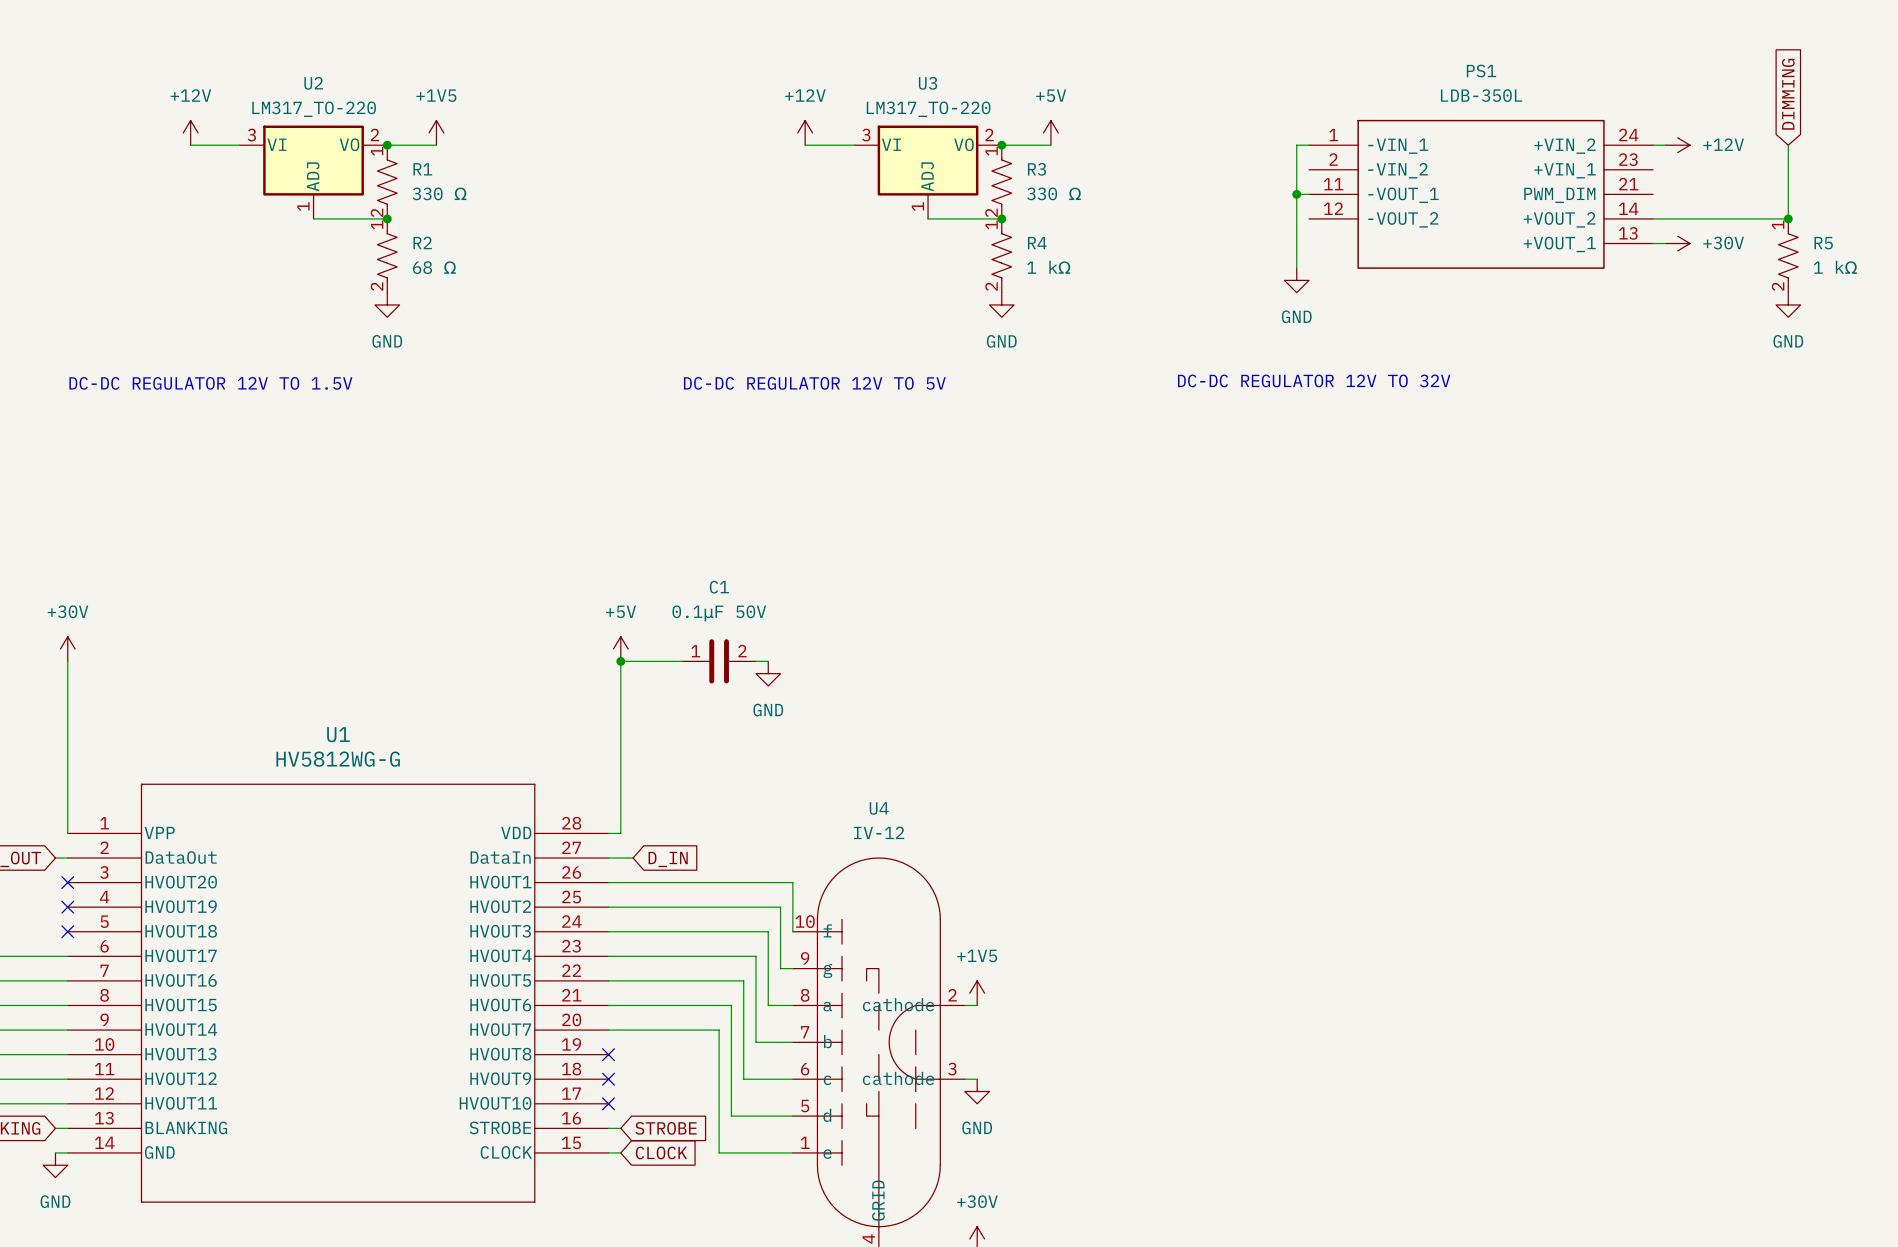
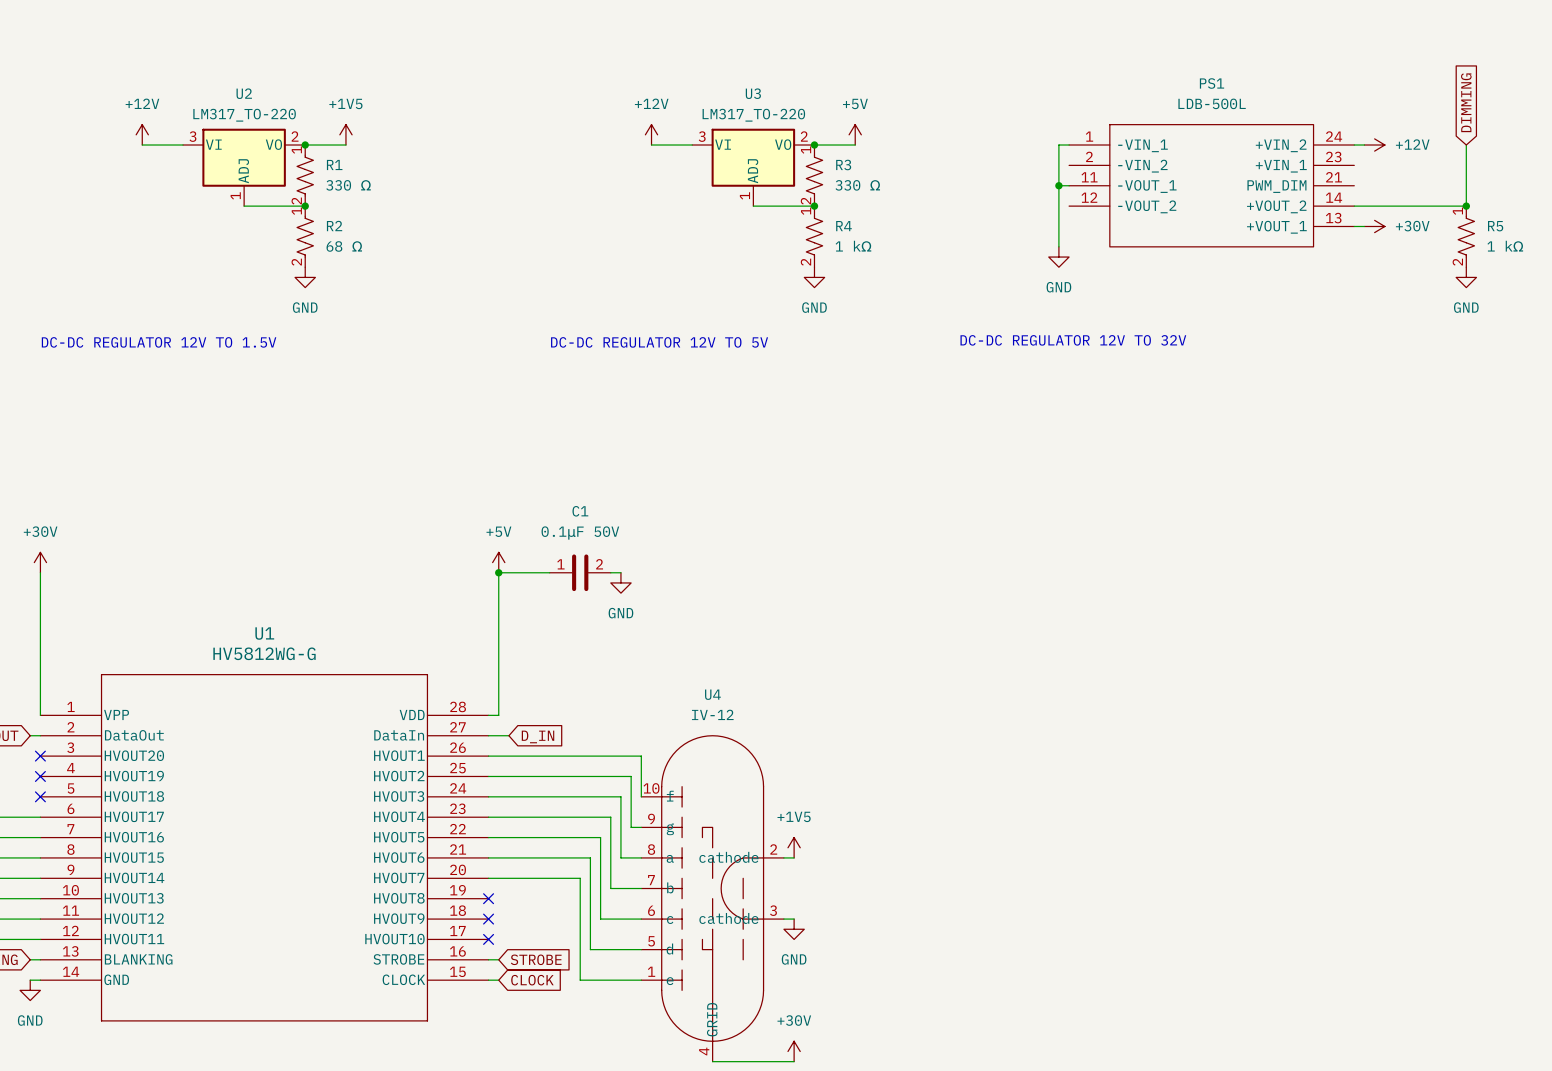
PS1 value: LDB-350L (1481, 95) -> LDB-500L (1212, 103)

